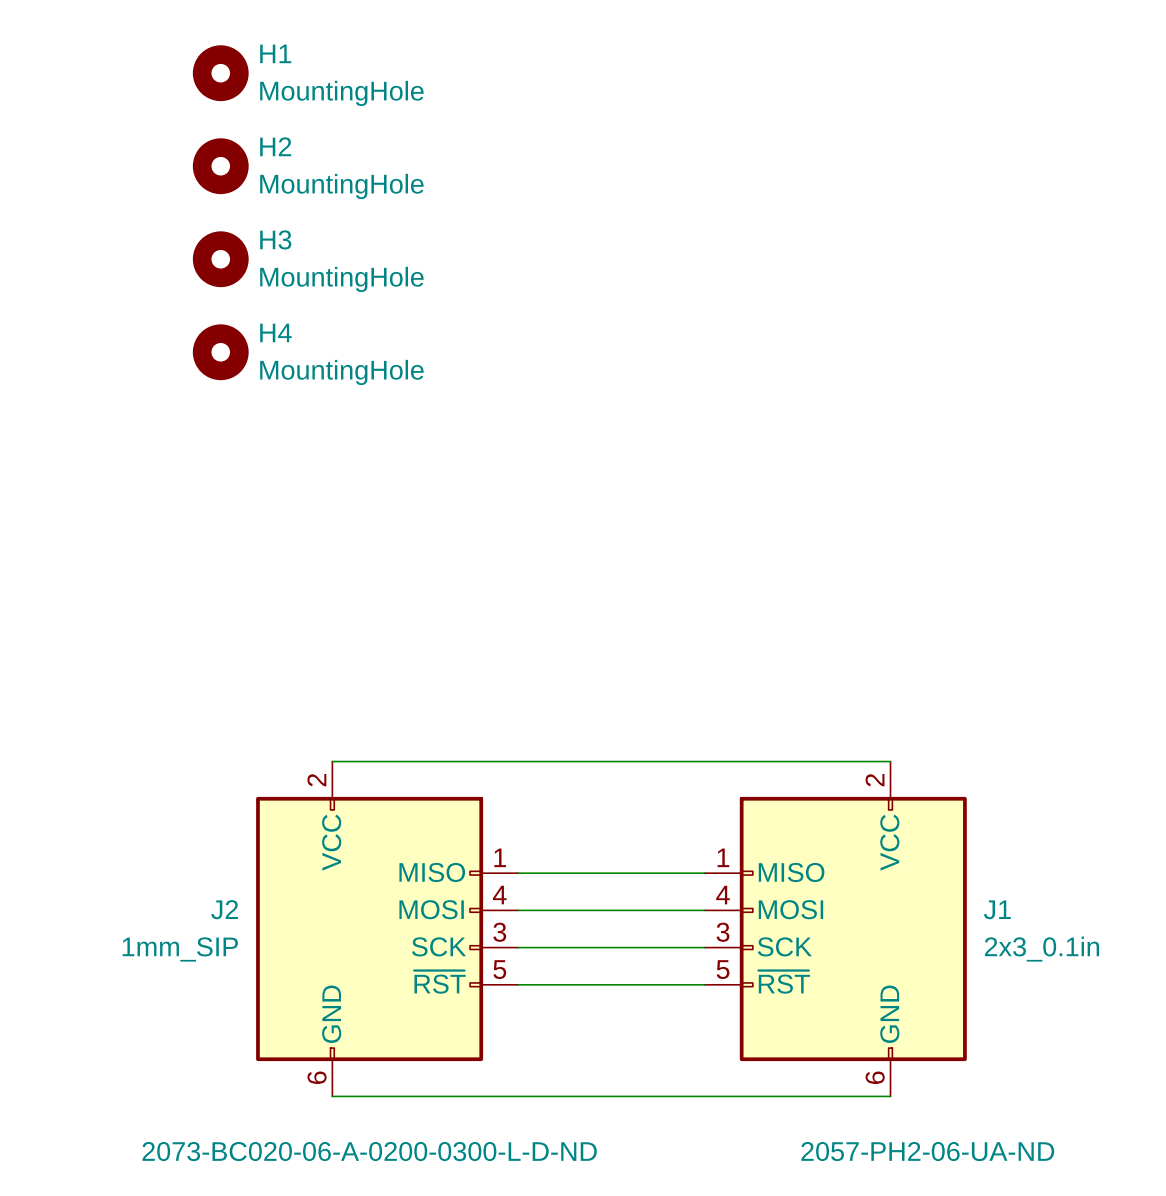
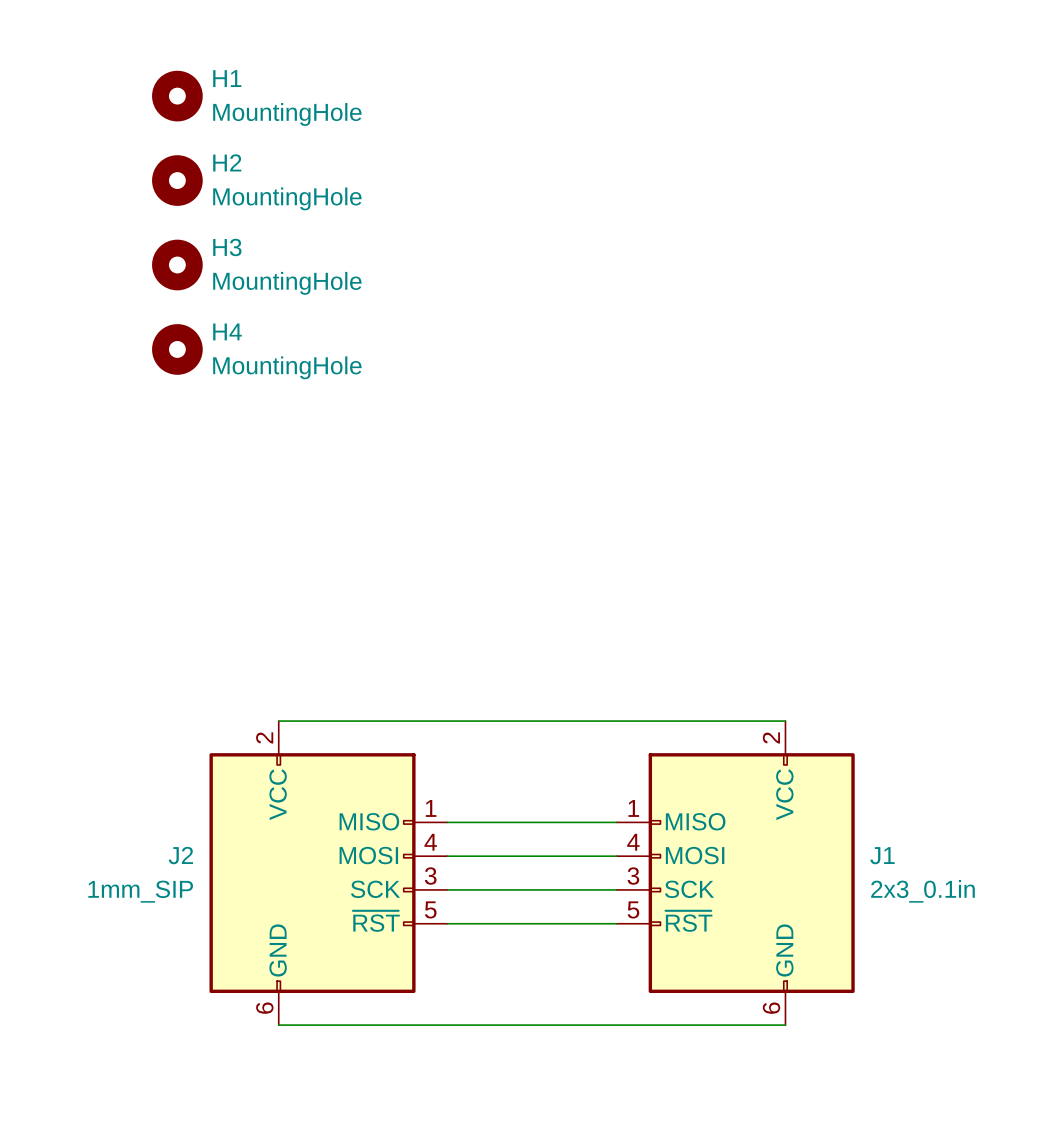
J2 text: 2073-BC020-06-A-0200-0300-L-D-ND (369, 1151) -> none
J1 text: 2057-PH2-06-UA-ND (927, 1151) -> none

